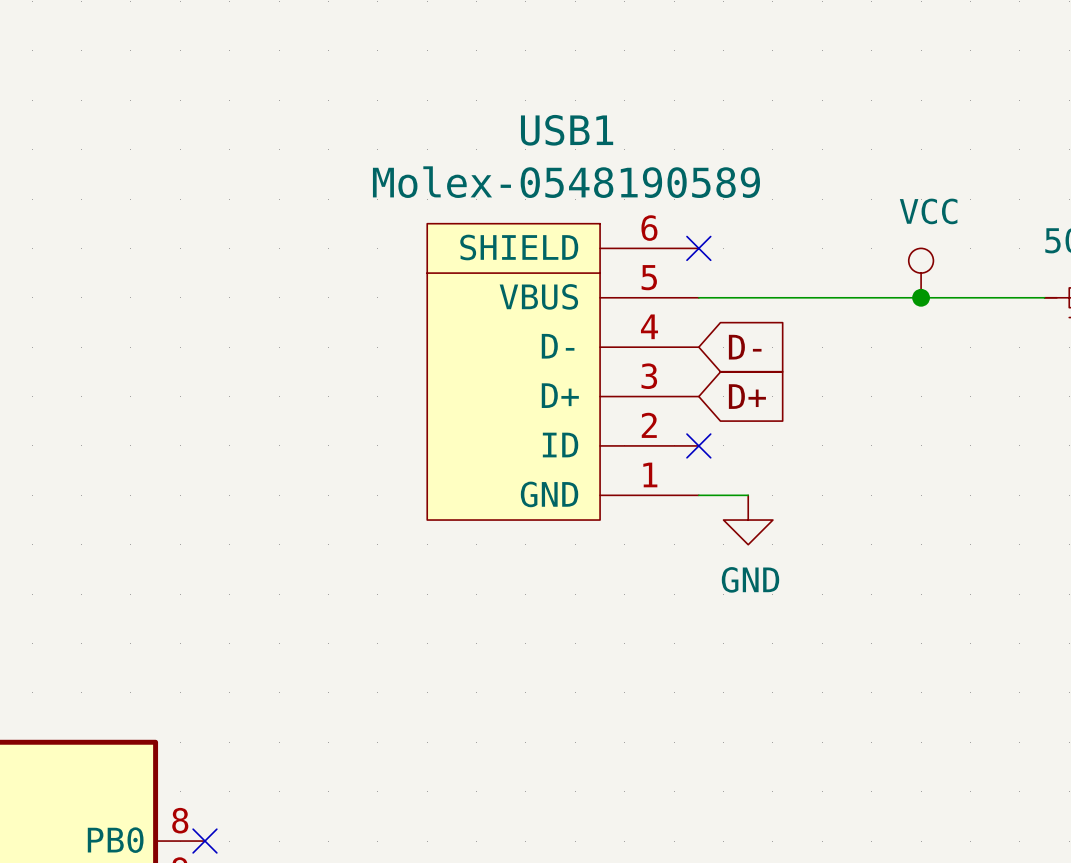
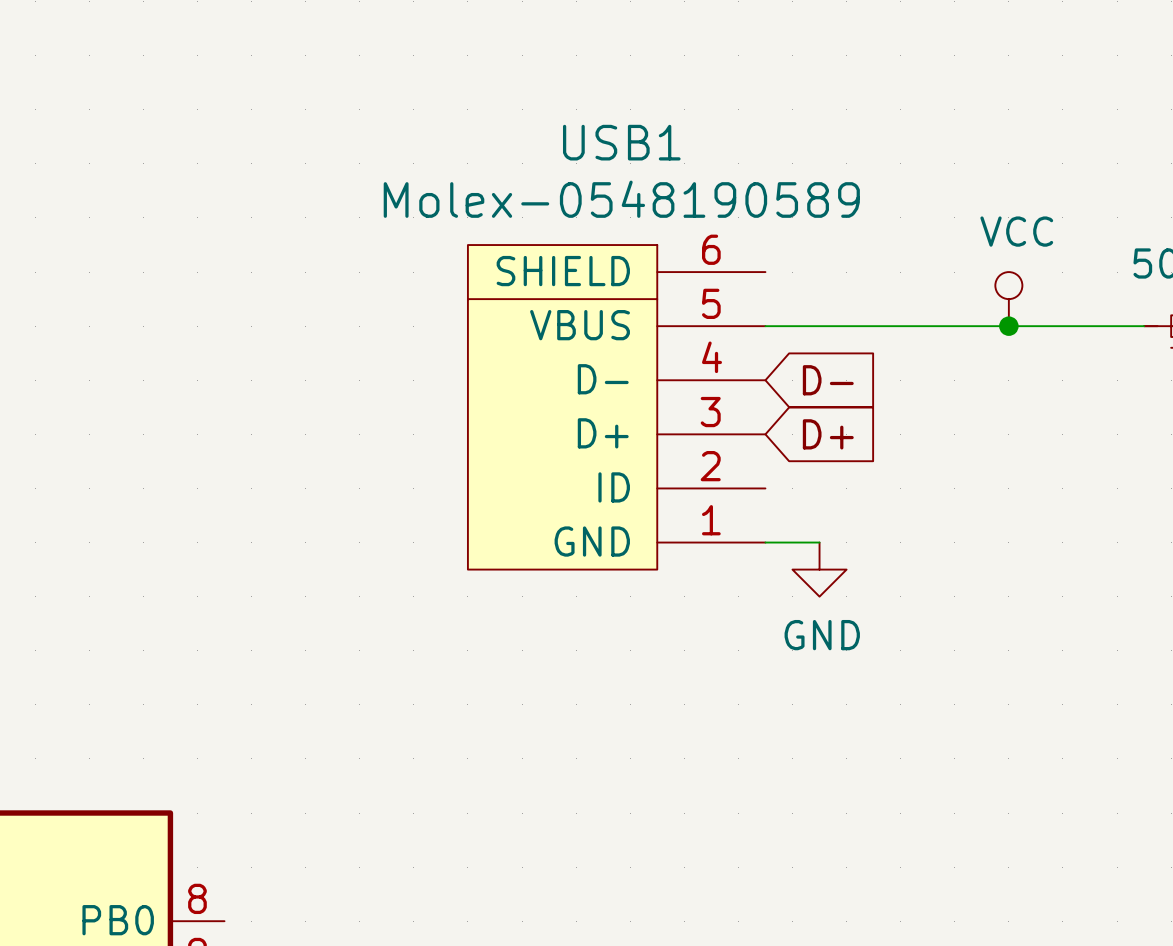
no-connect mark: (698, 248) -> none
no-connect mark: (698, 445) -> none
no-connect mark: (204, 841) -> none

